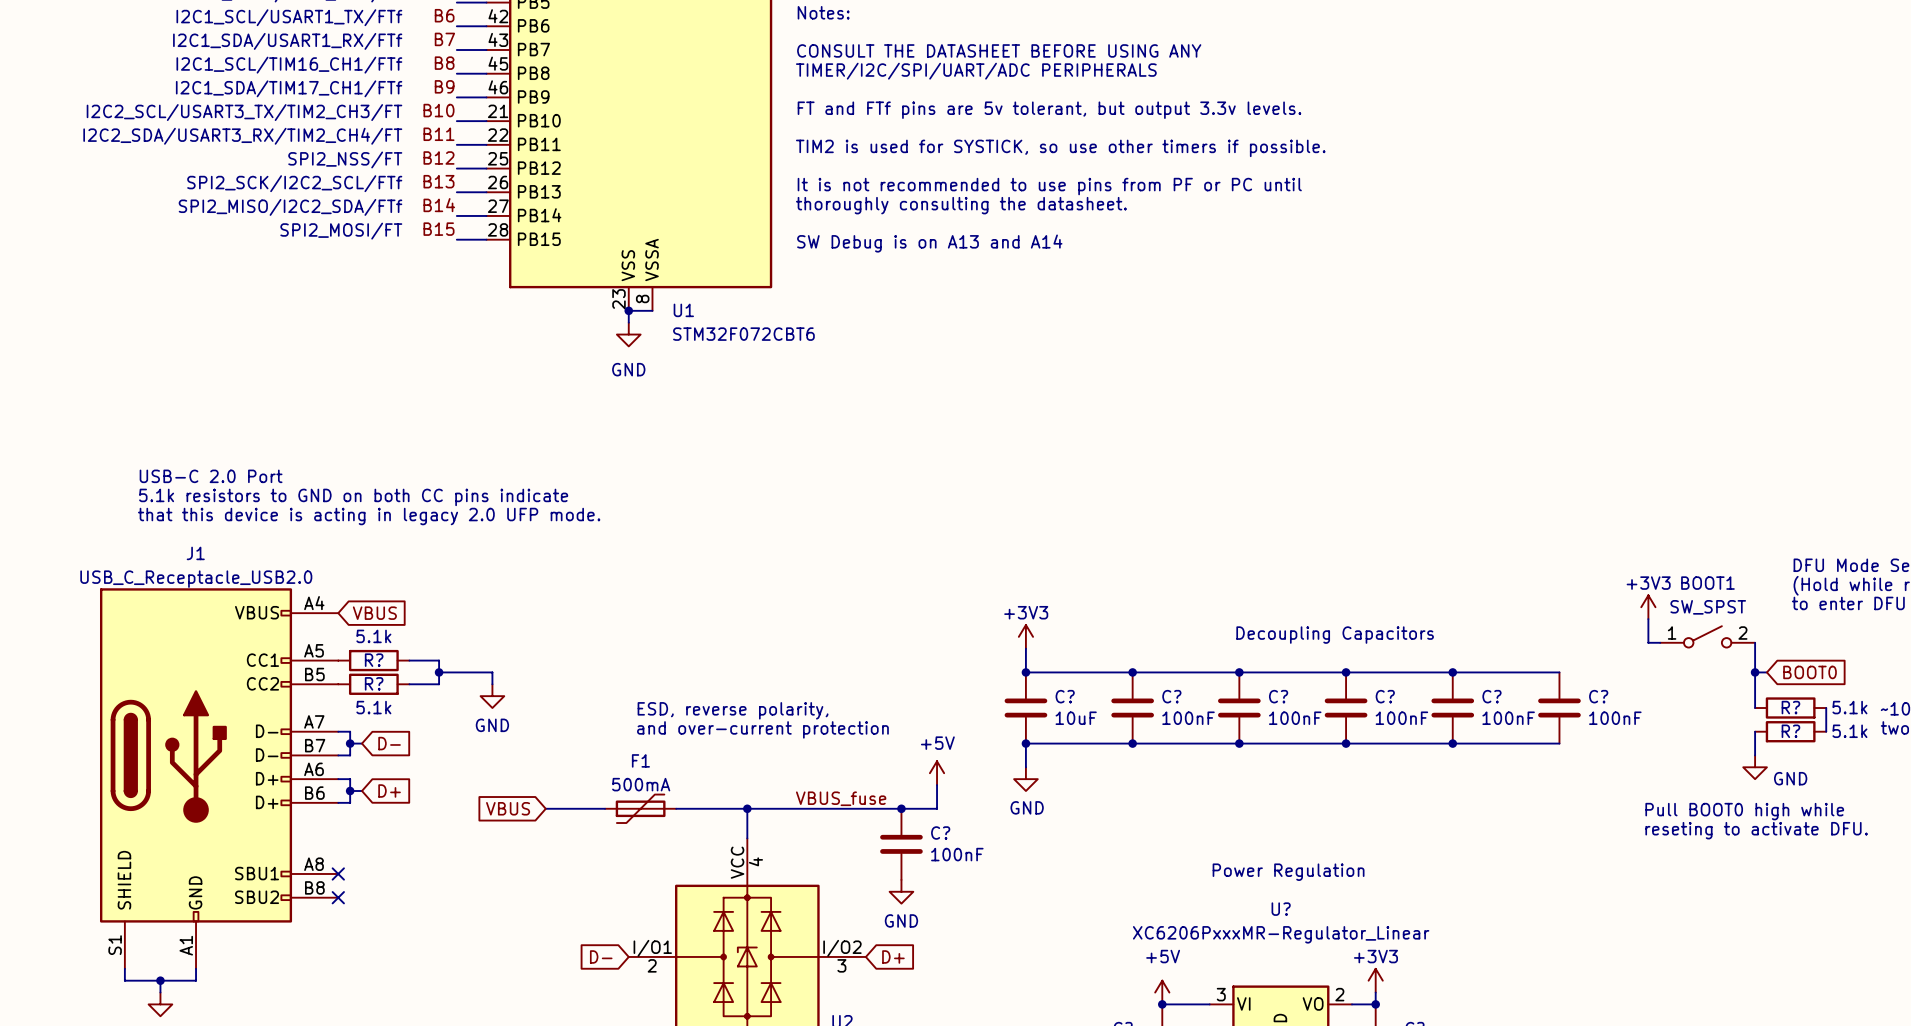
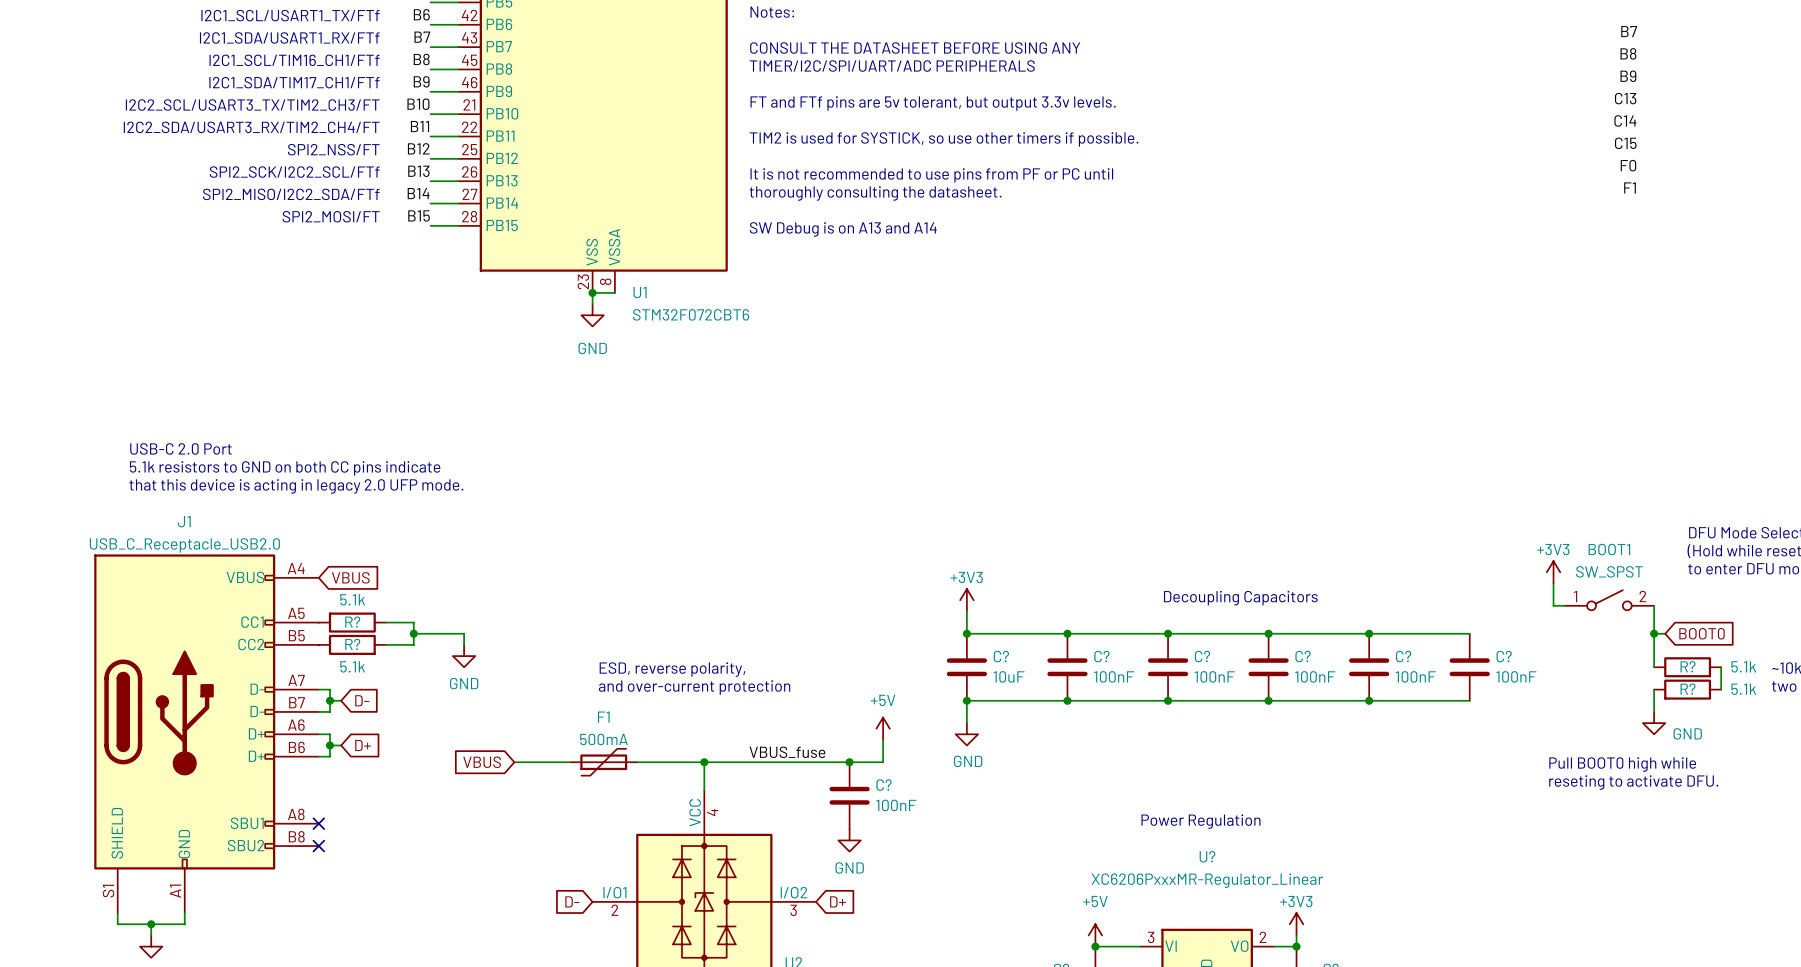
label: none -> B7 (1629, 31)
label: none -> B8 (1628, 53)
label: none -> B9 (1628, 76)
label: none -> C13 (1625, 98)
label: none -> C14 (1625, 120)
label: none -> C15 (1625, 143)
label: none -> F0 (1628, 165)
label: none -> F1 (1630, 187)

